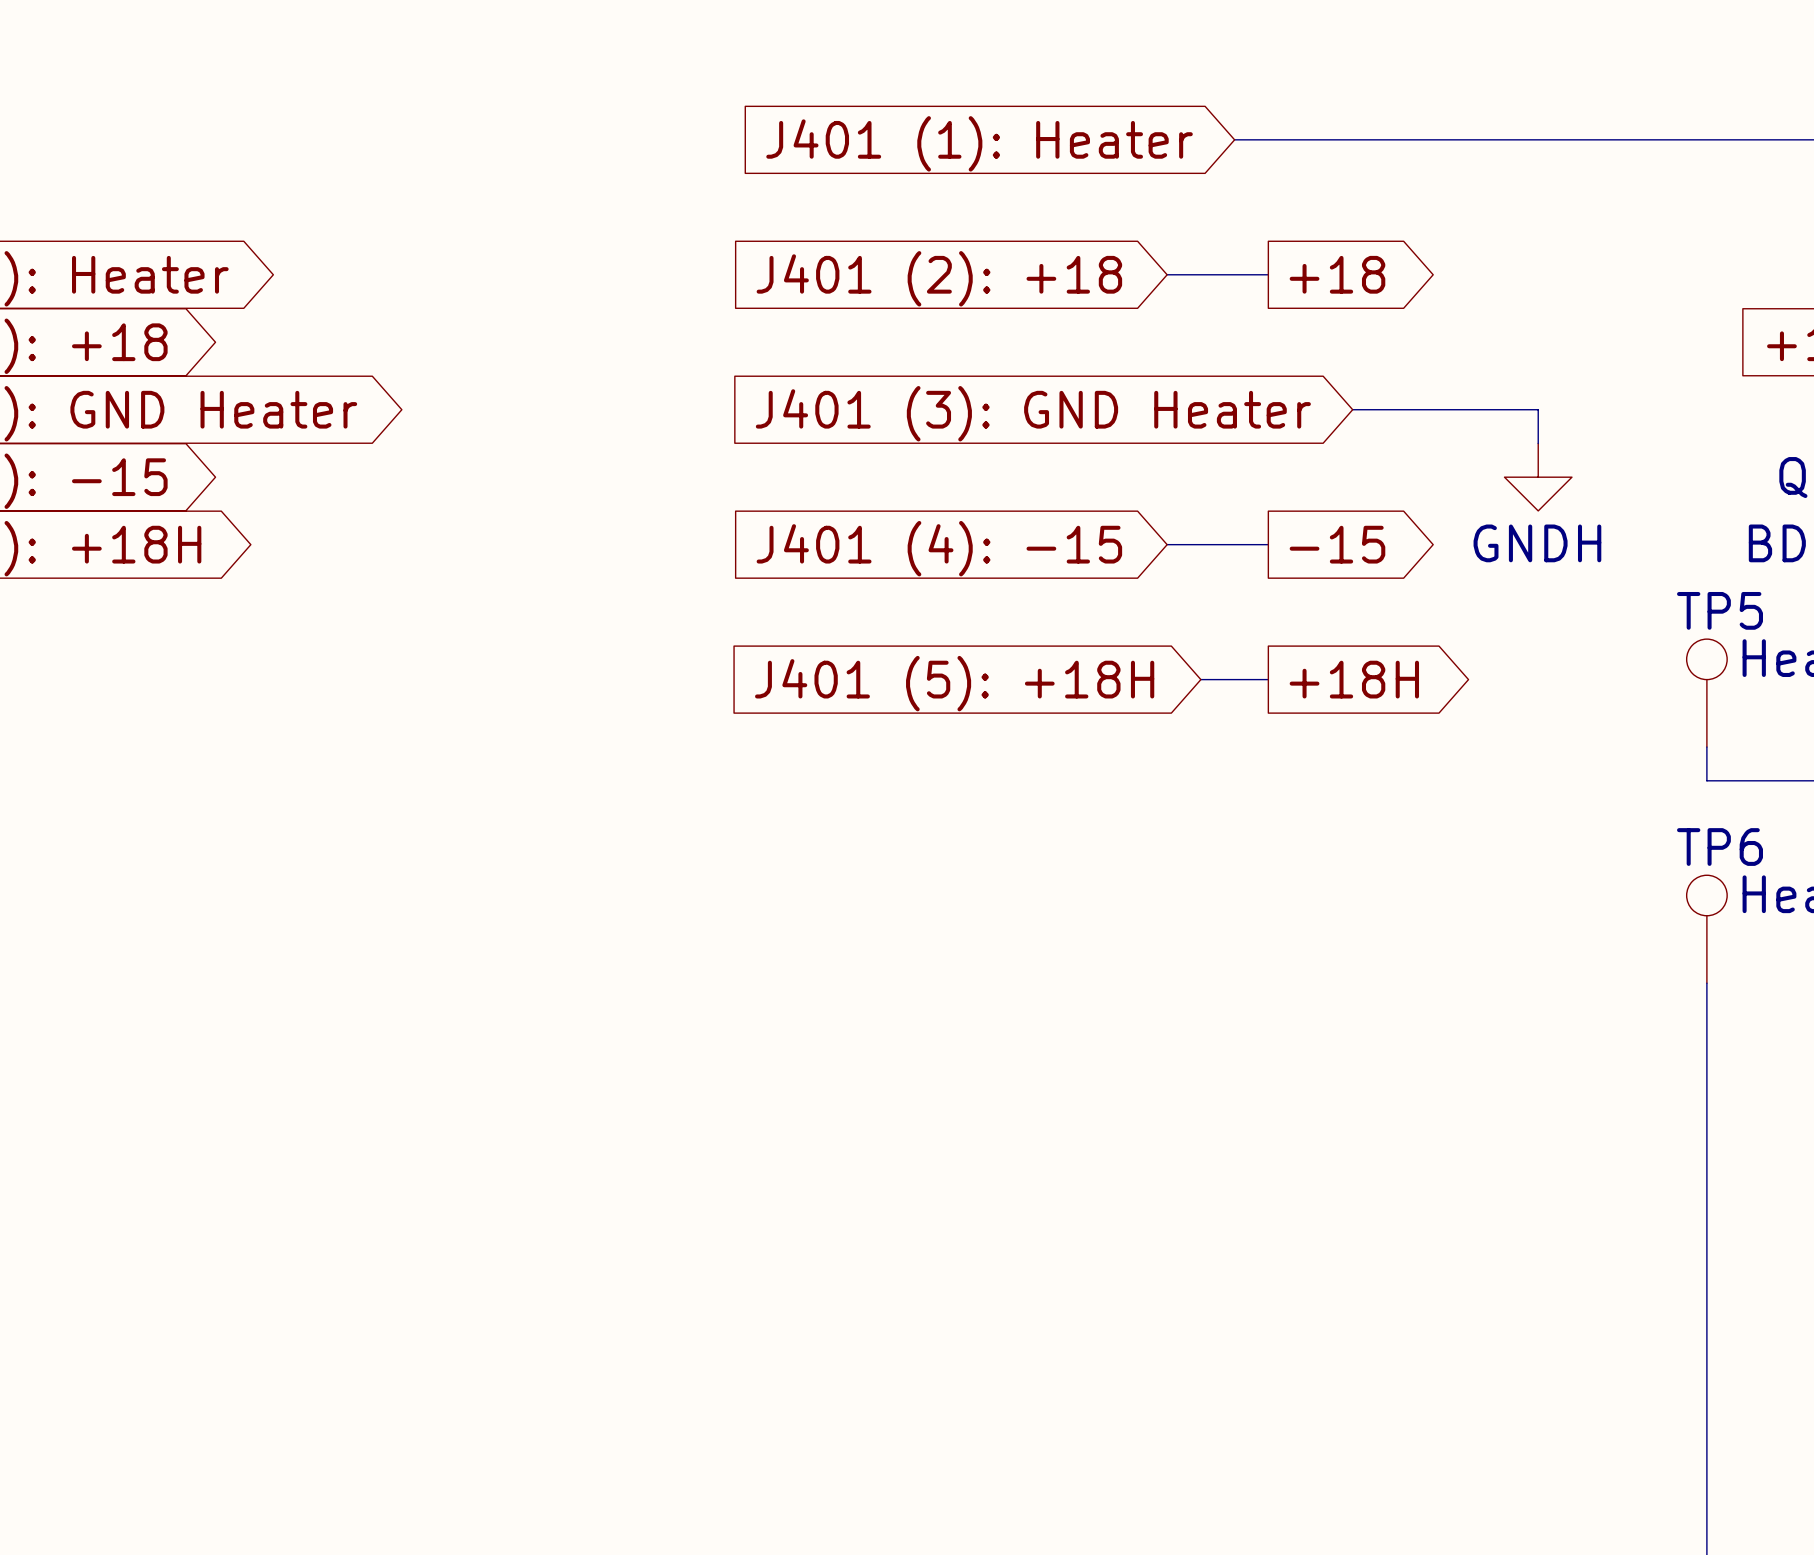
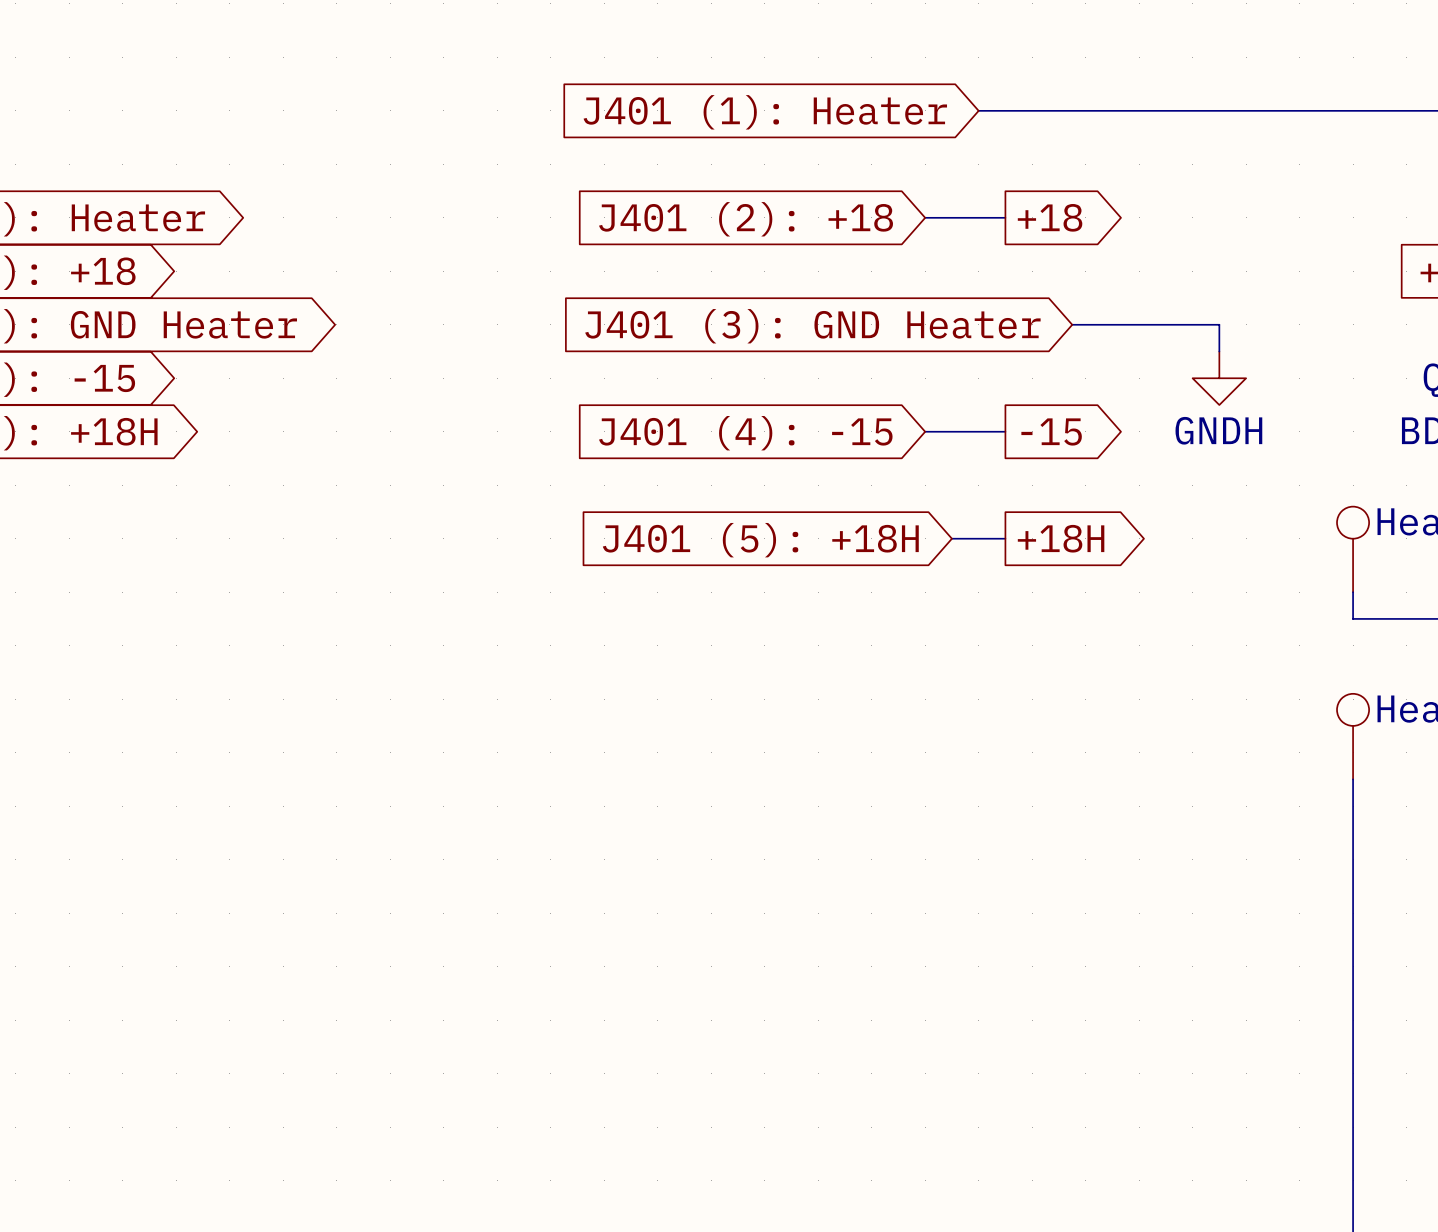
TP5 name: TP5 (1720, 610) -> none
TP6 name: TP6 (1720, 847) -> none

